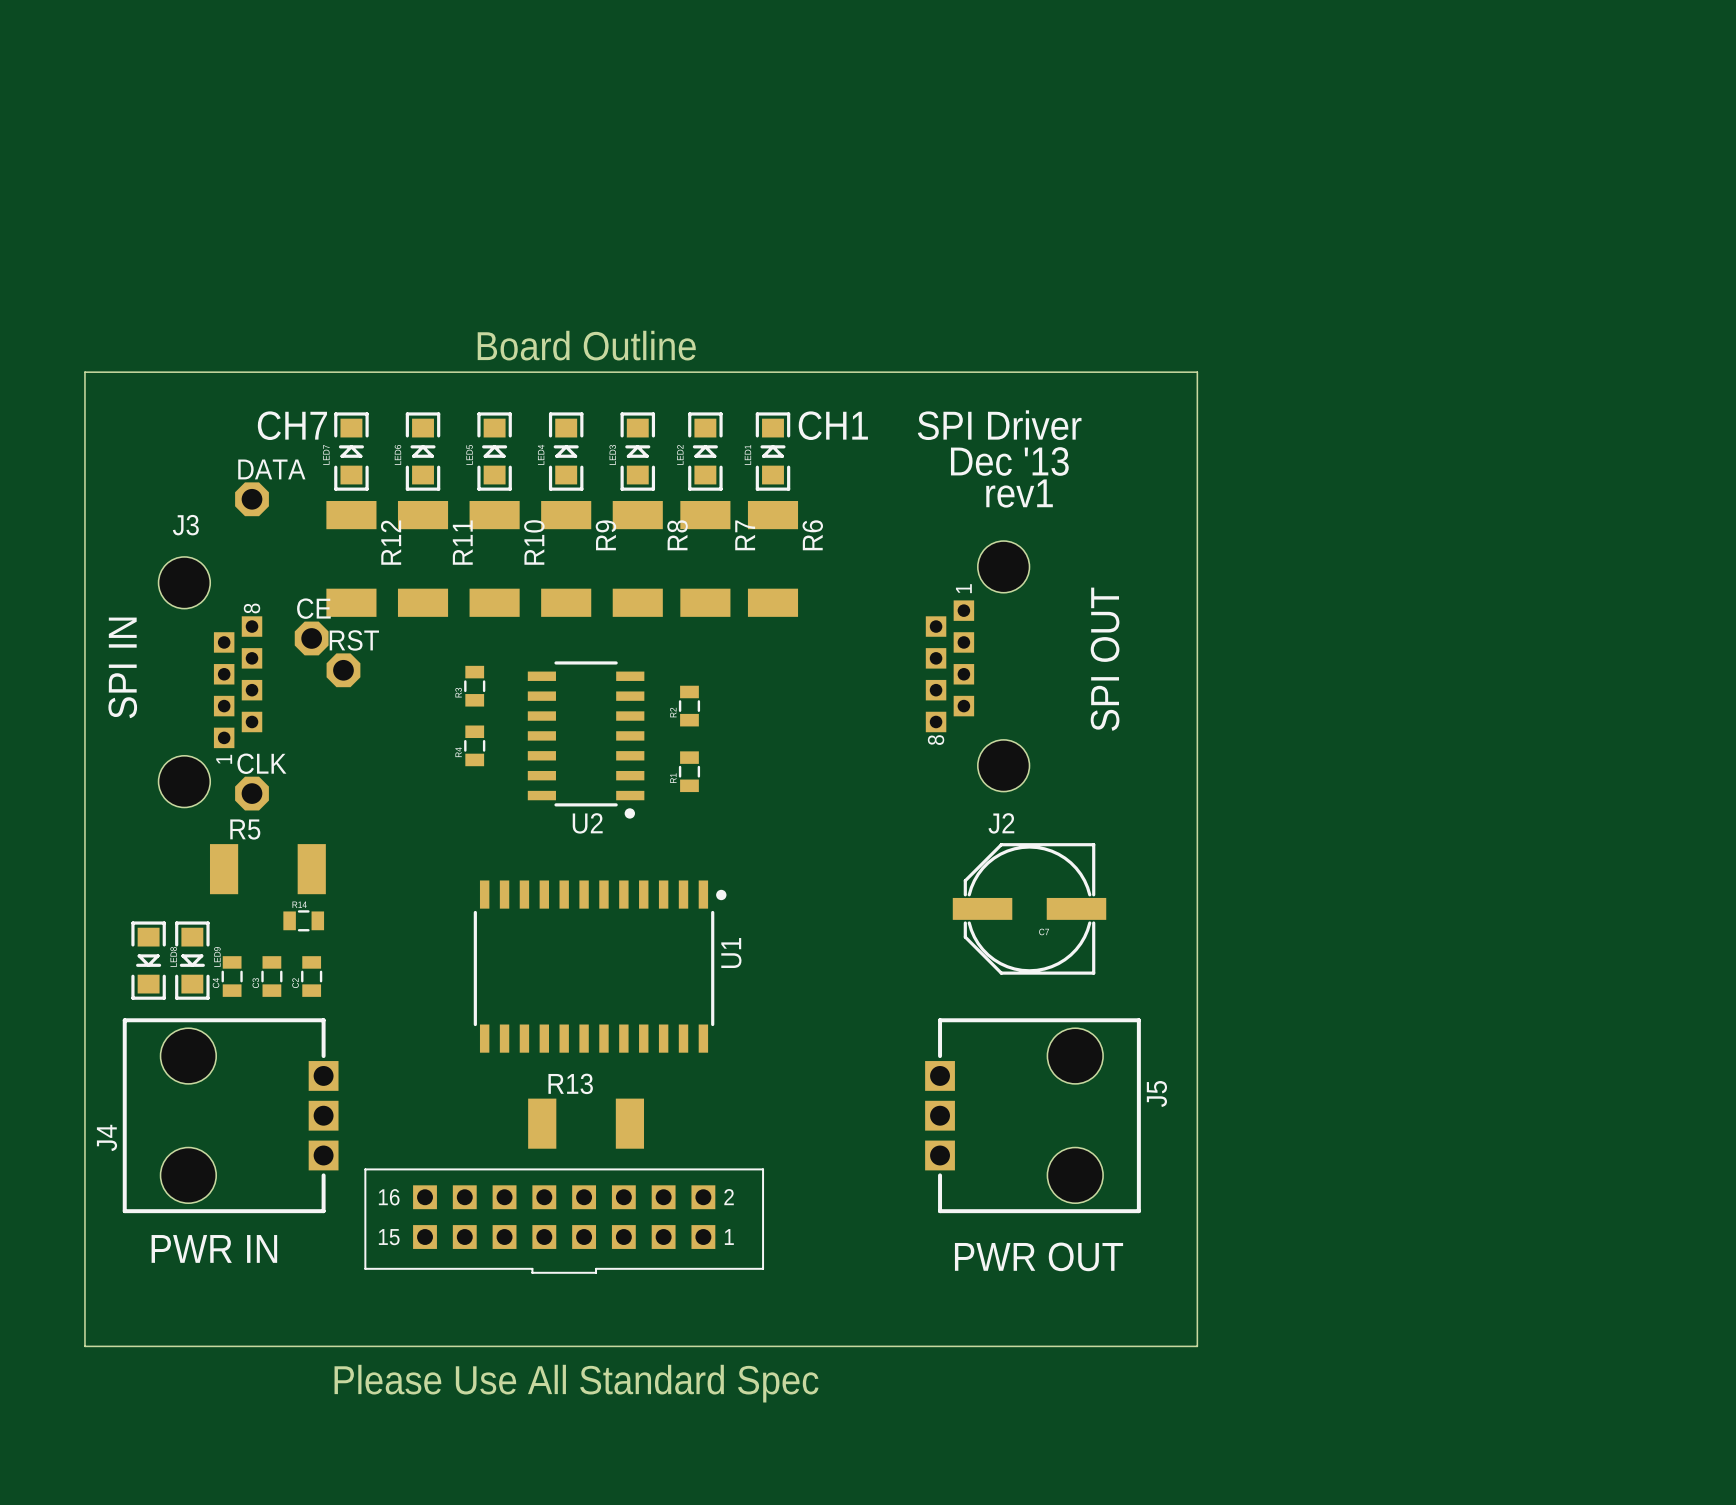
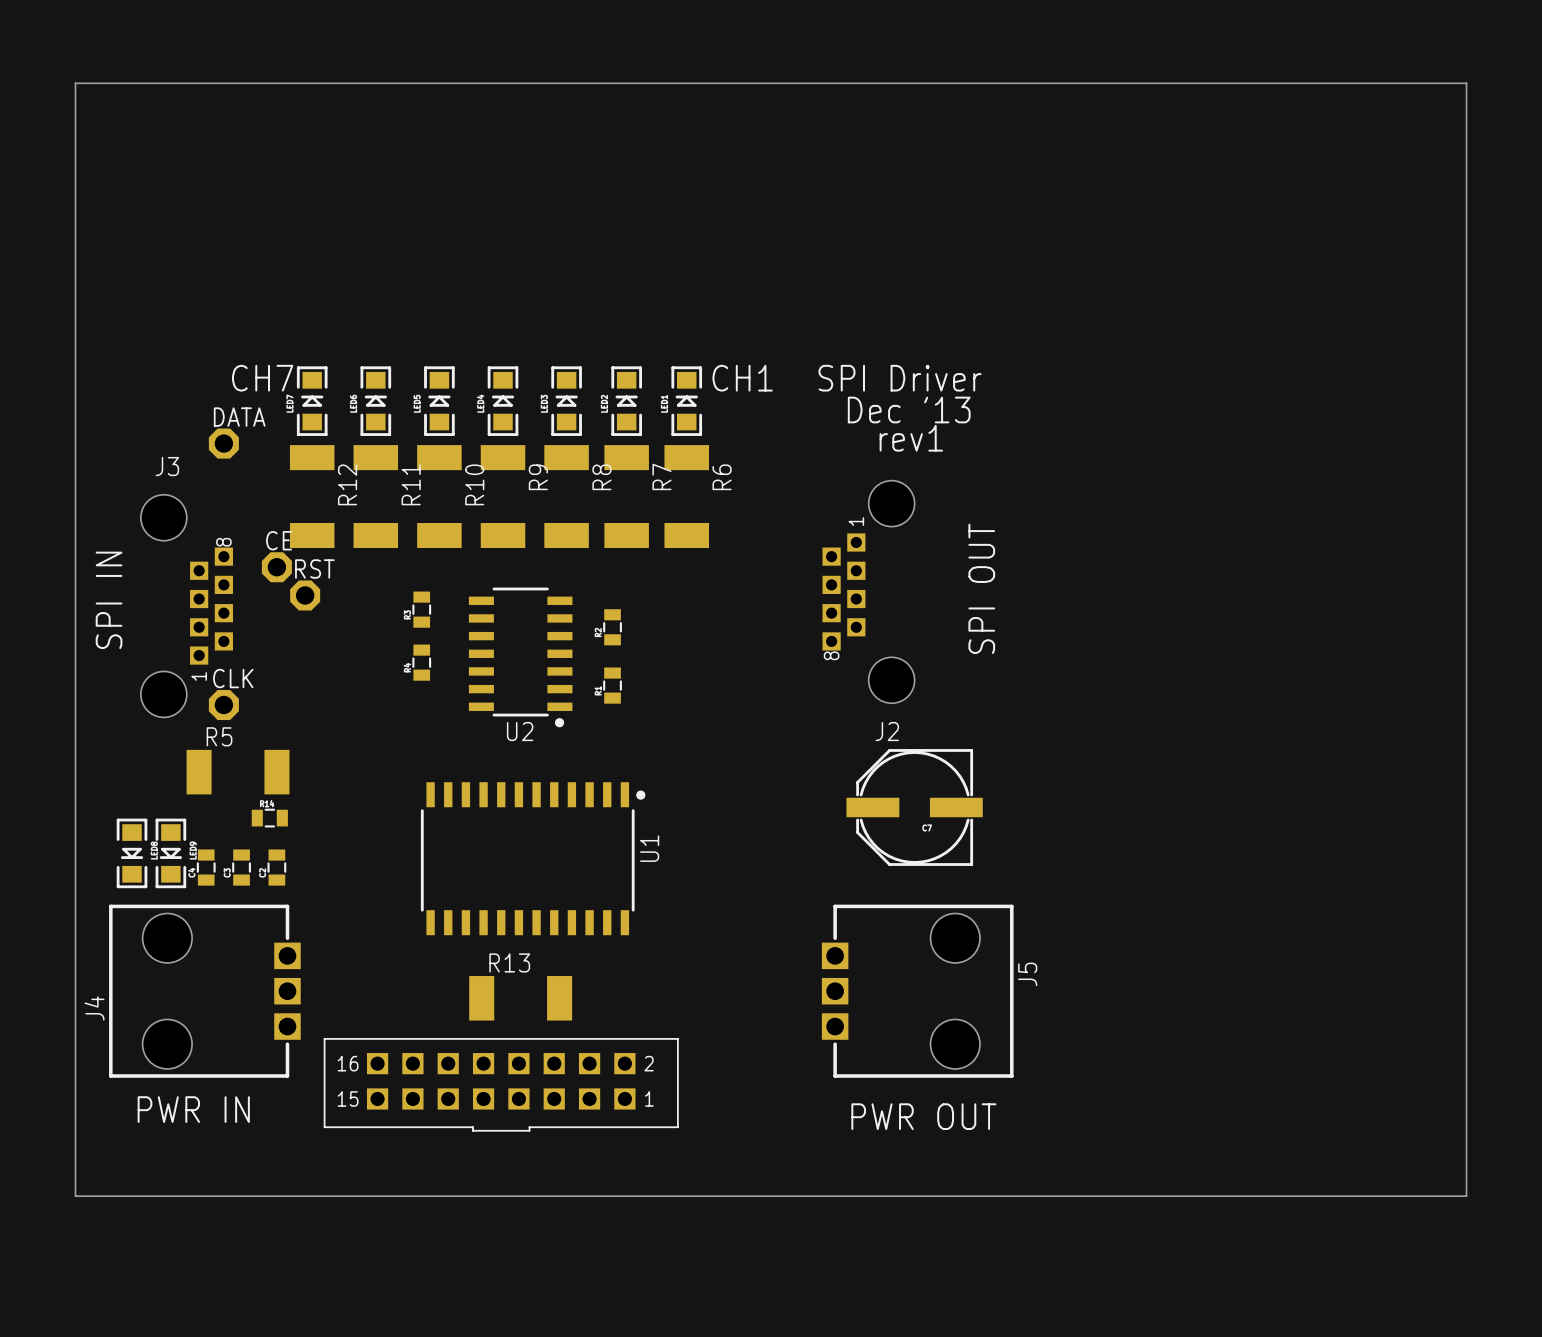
text: Board Outline (586, 345) -> none
board edge: (84, 372) (1197, 372) (1197, 1346) -> (75, 330) (75, 83) (1466, 83) (1466, 1196) (1063, 1196)
text: Please Use All Standard Spec (576, 1383) -> none

